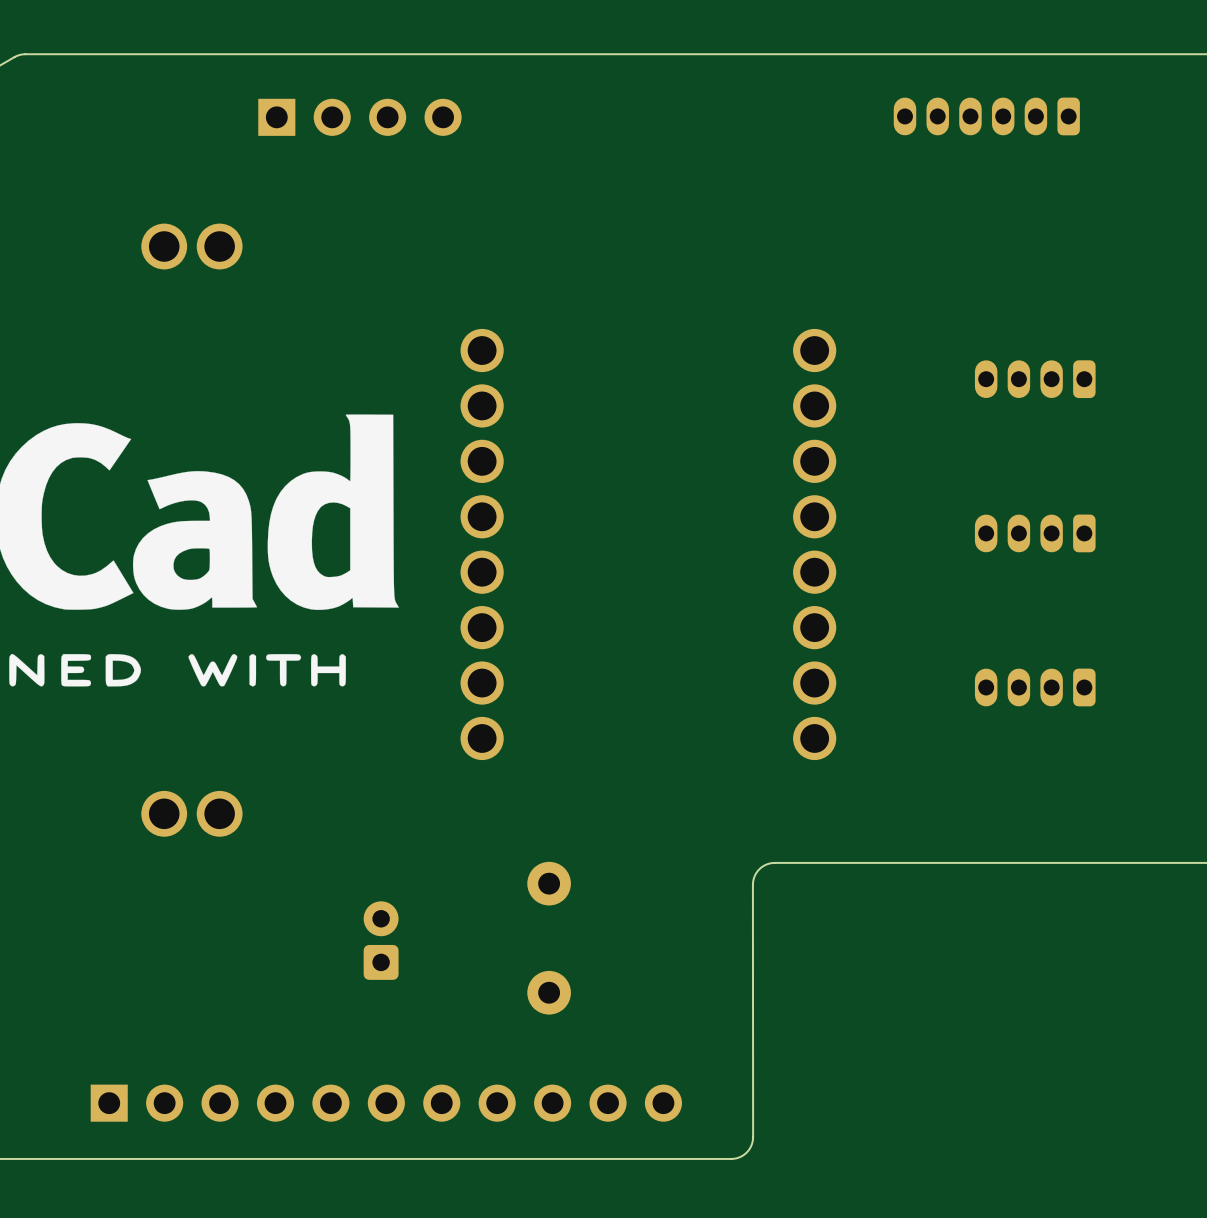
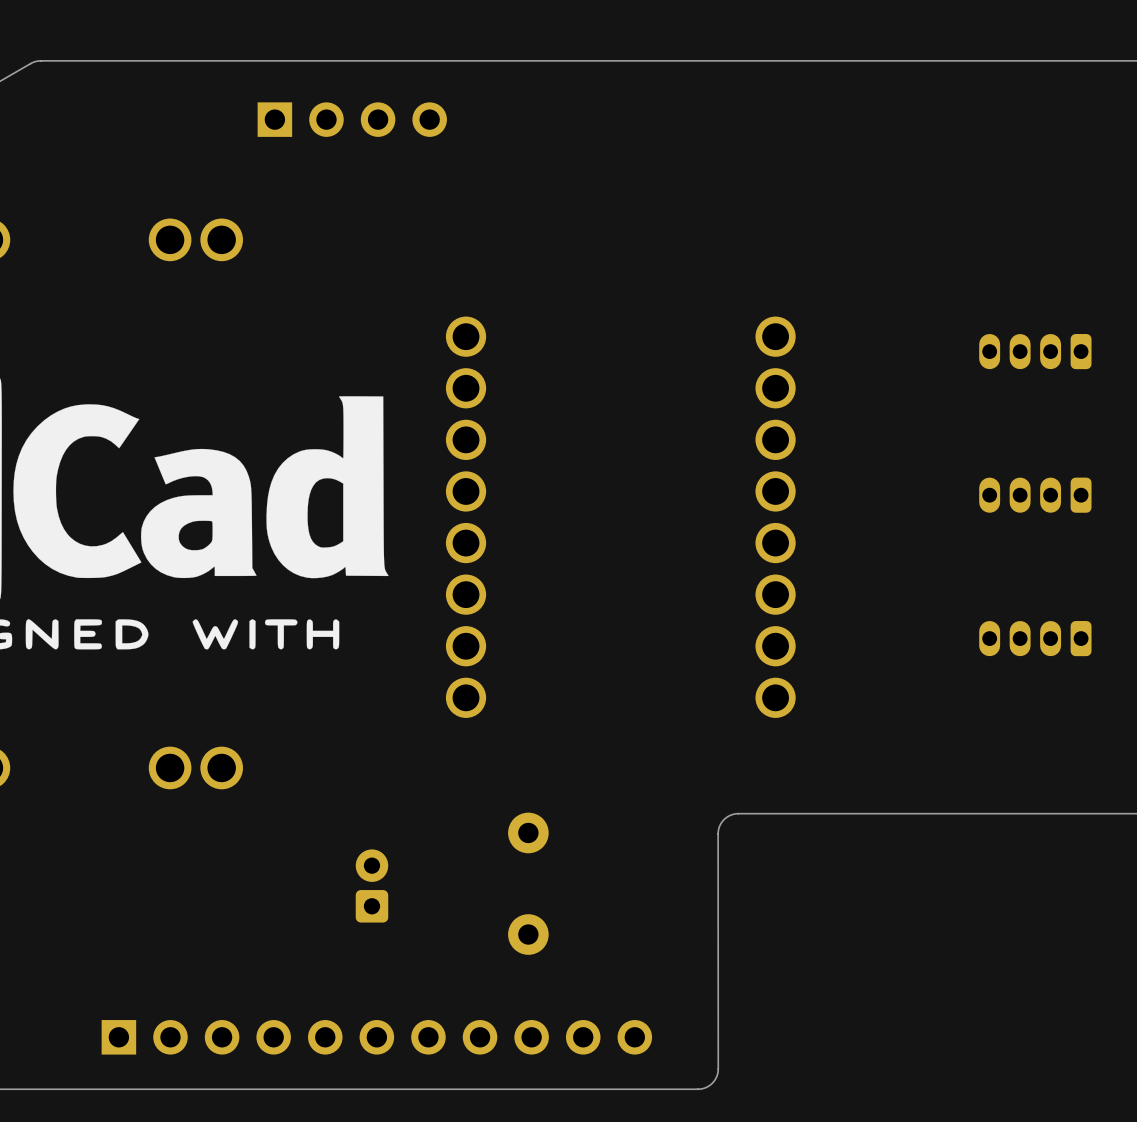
part: (986, 116) -> none
part position: (1035, 379) -> (1035, 351)
part position: (1035, 533) -> (1035, 495)
part position: (1035, 687) -> (1035, 638)

